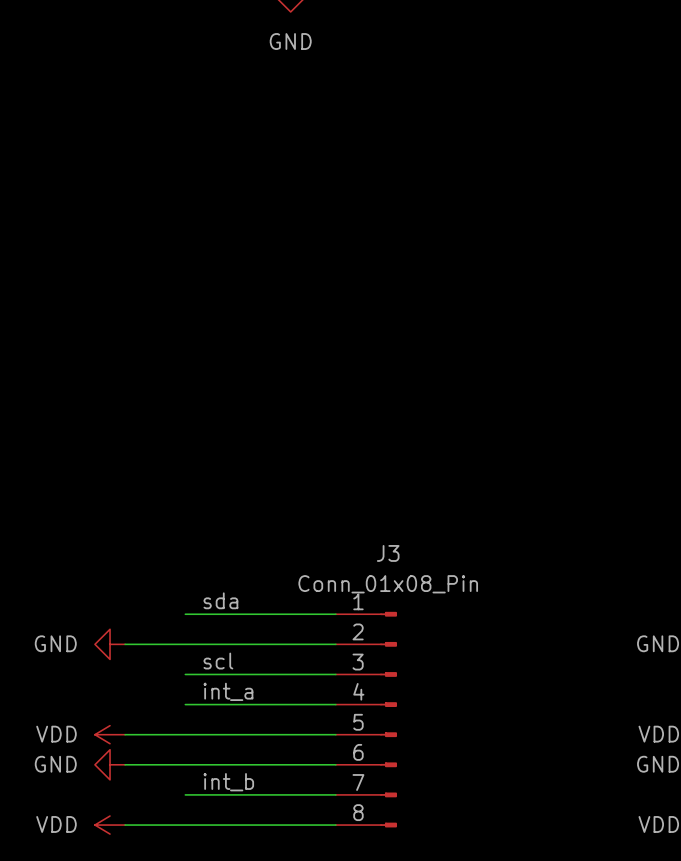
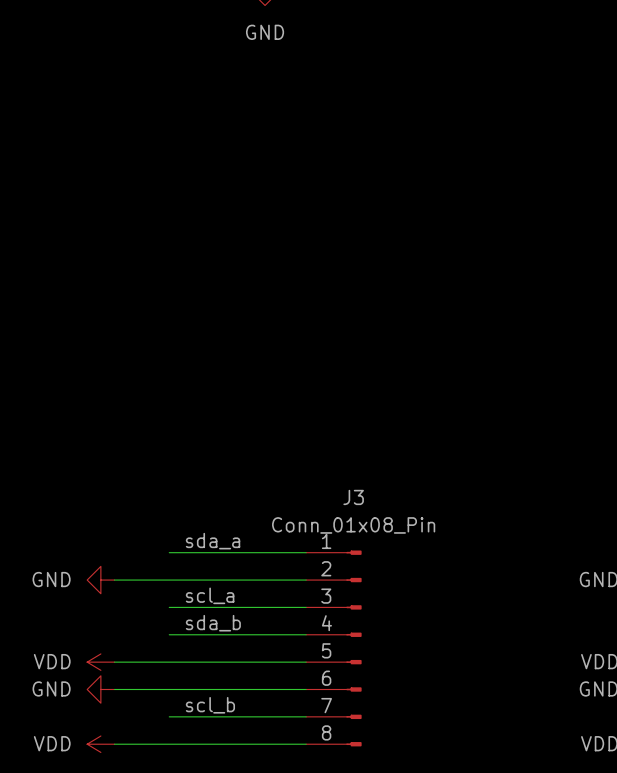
label: sda (220, 600) -> sda_a (213, 541)
label: scl (218, 661) -> scl_a (210, 595)
label: int_a (228, 691) -> sda_b (213, 623)
label: int_b (228, 782) -> scl_b (210, 705)

